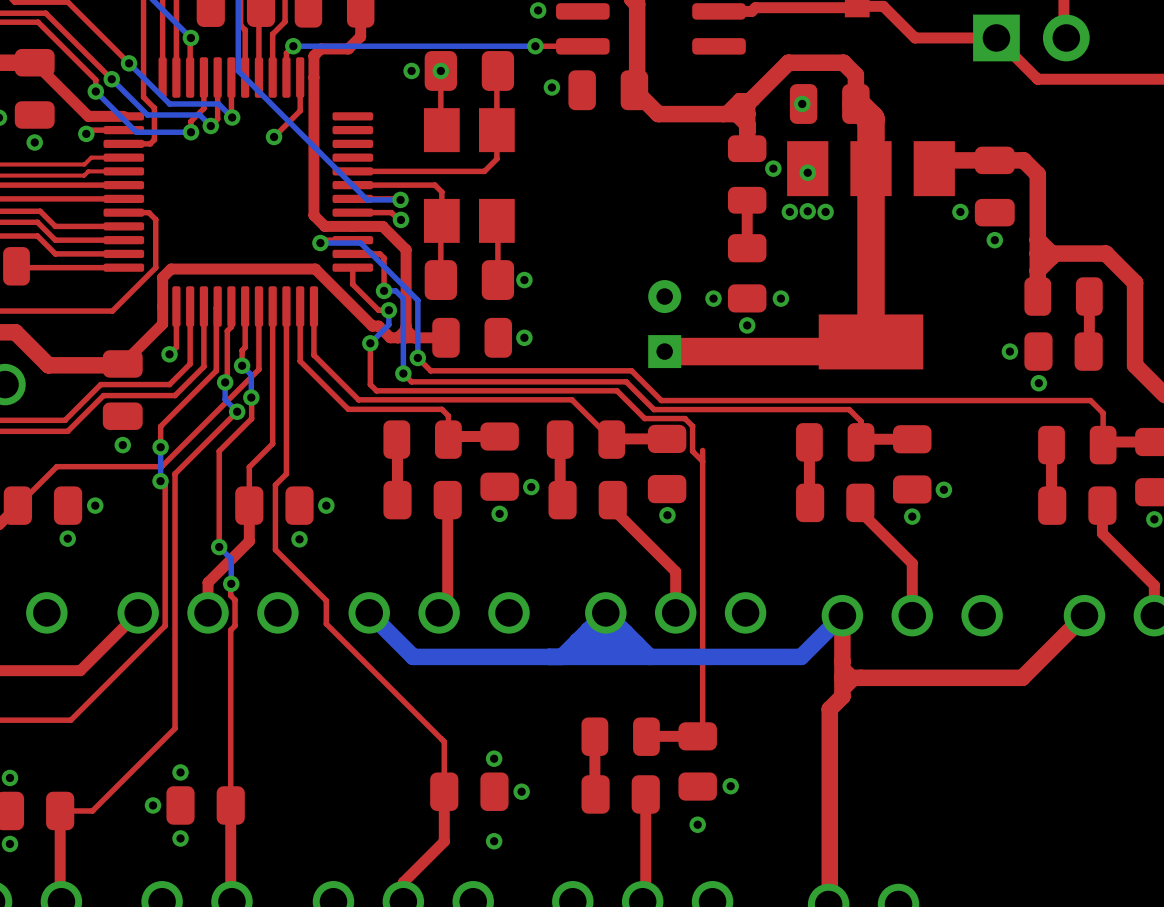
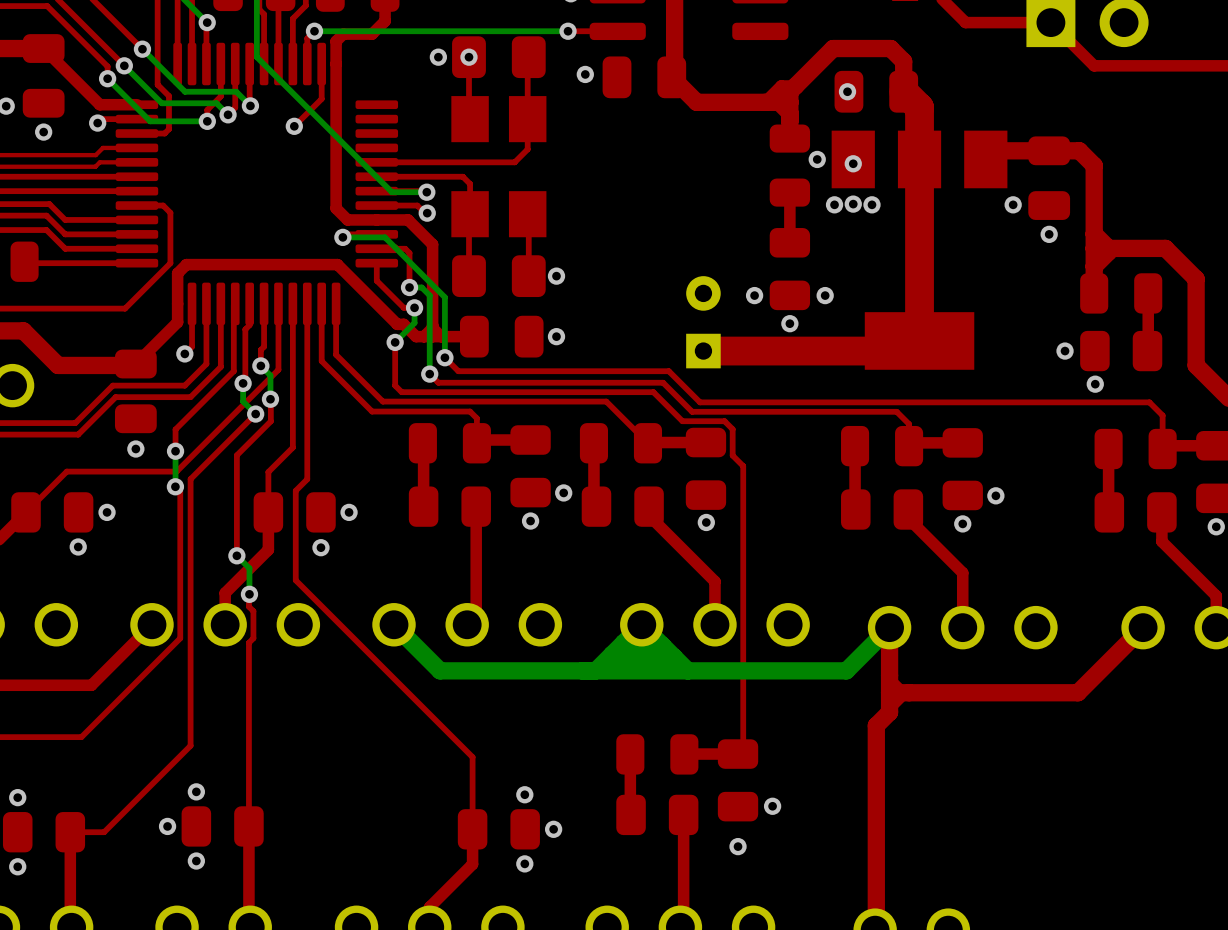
top track: (702, 450) (702, 461) -> none
top track: (275, 549) (326, 600) (326, 623) (444, 741) -> (295, 558) (295, 580) (472, 757) (472, 759)
via position: (494, 758) -> (524, 794)
part position: (469, 791) -> (498, 829)
via position: (521, 791) -> (553, 829)

